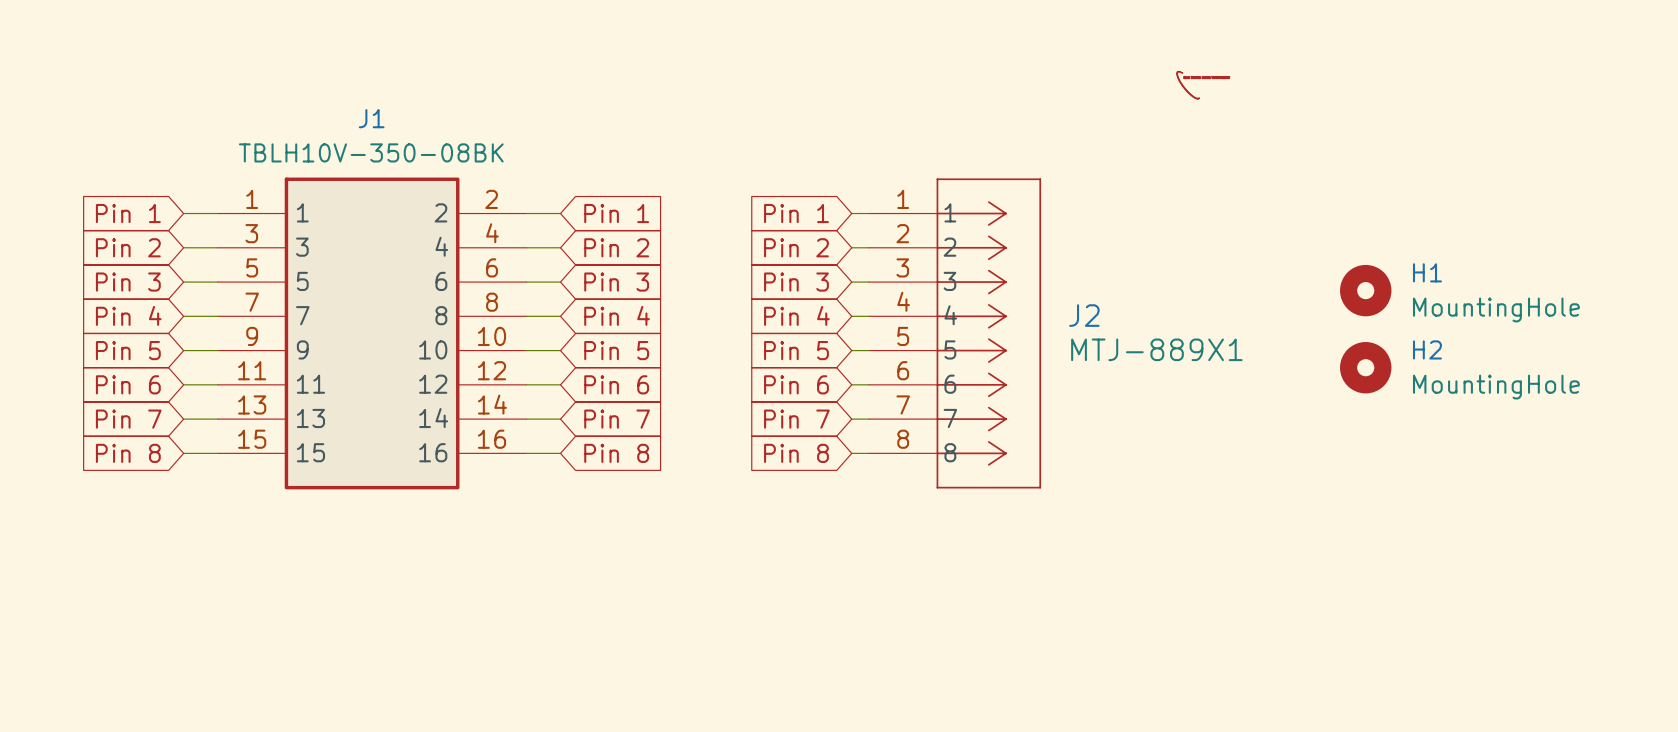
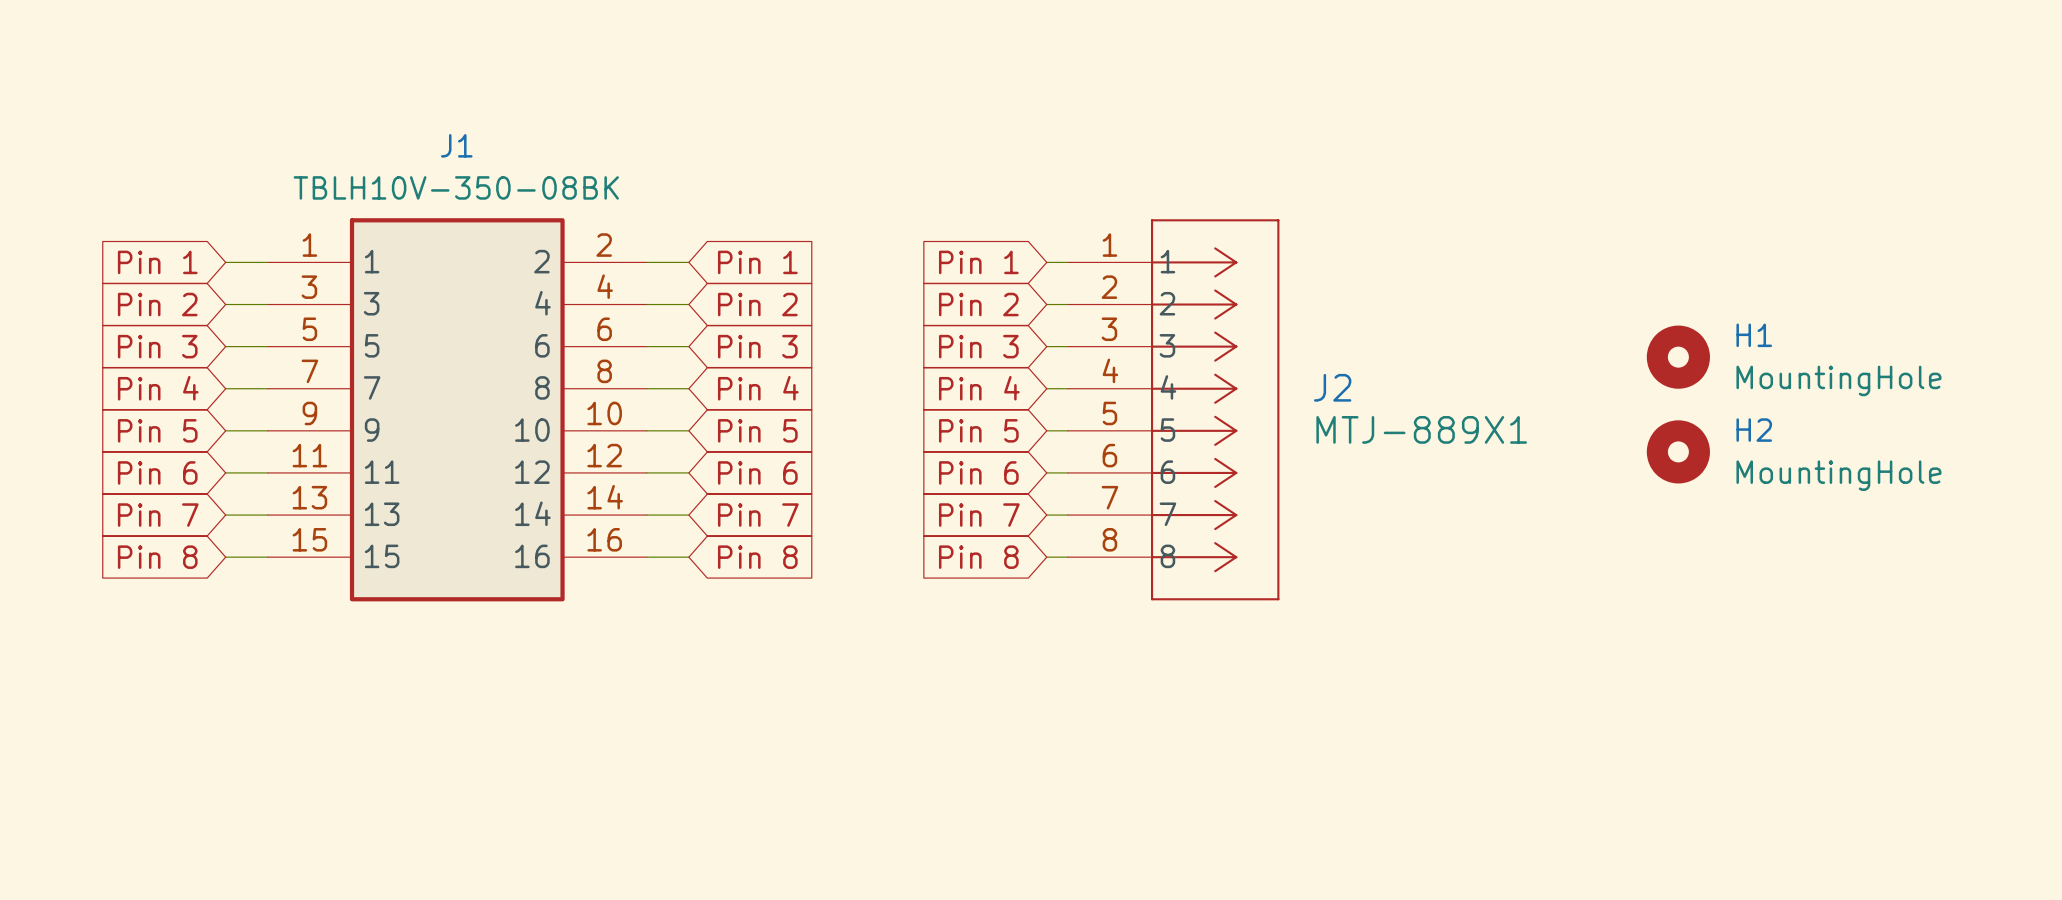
power symbol: (1203, 85) -> none

